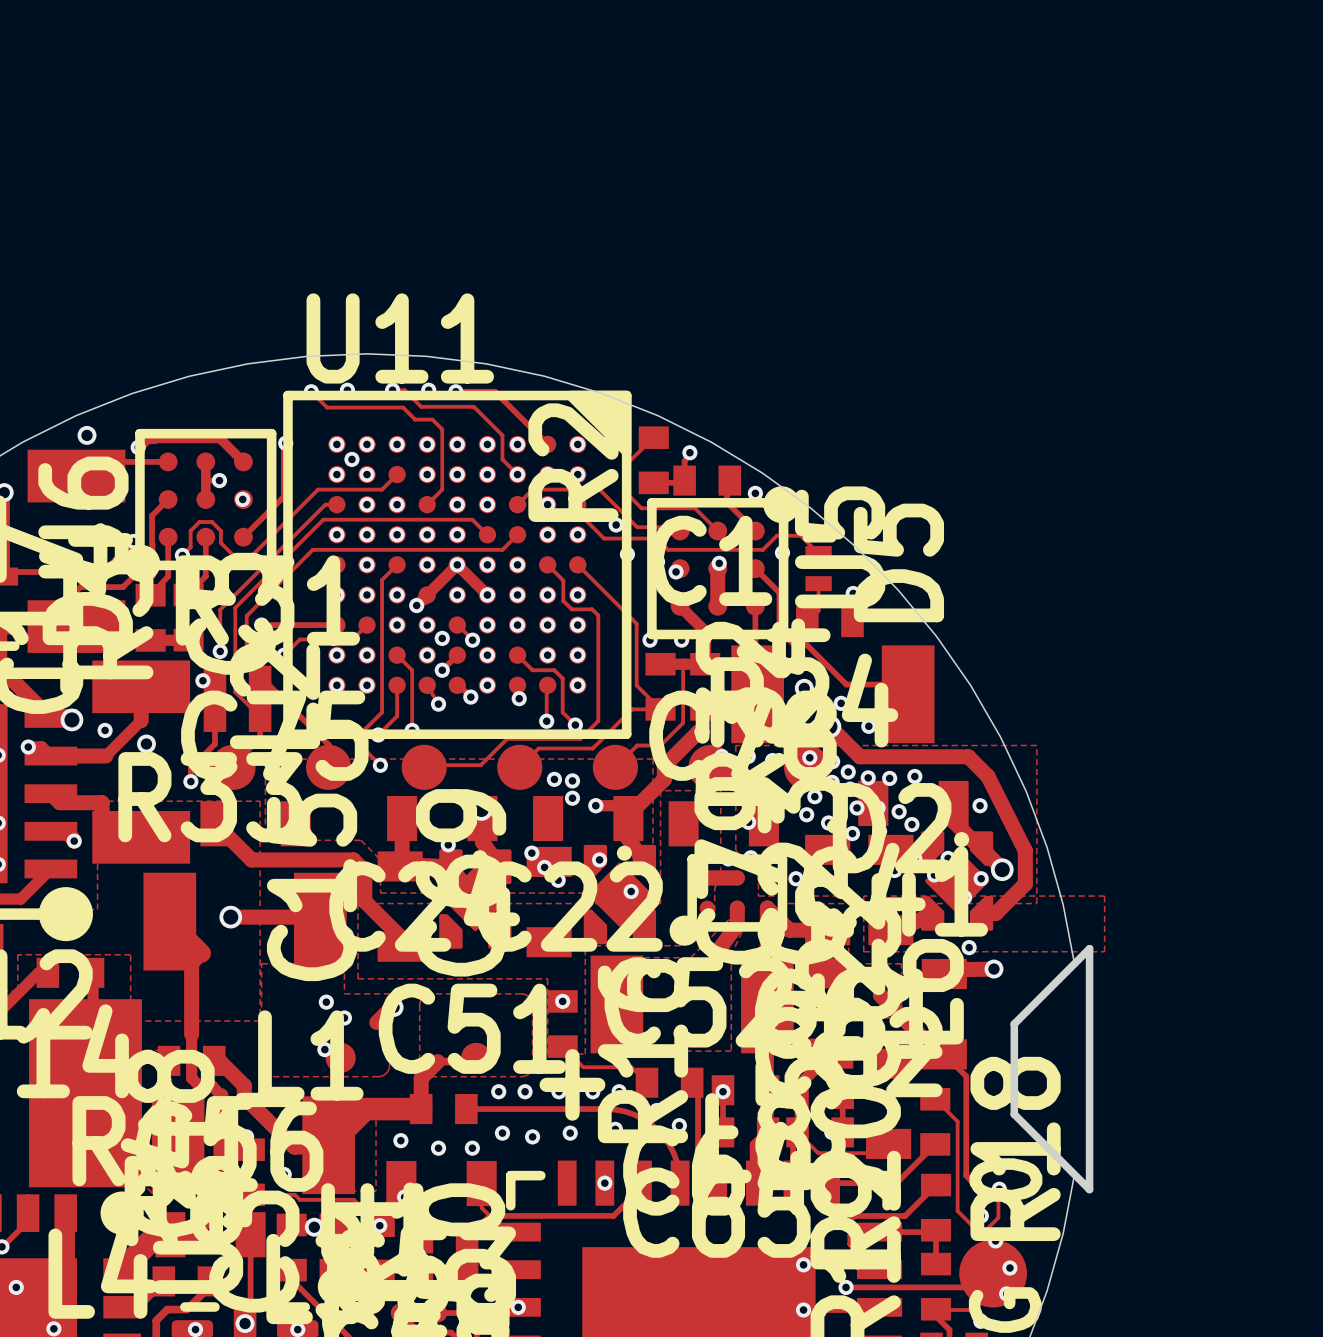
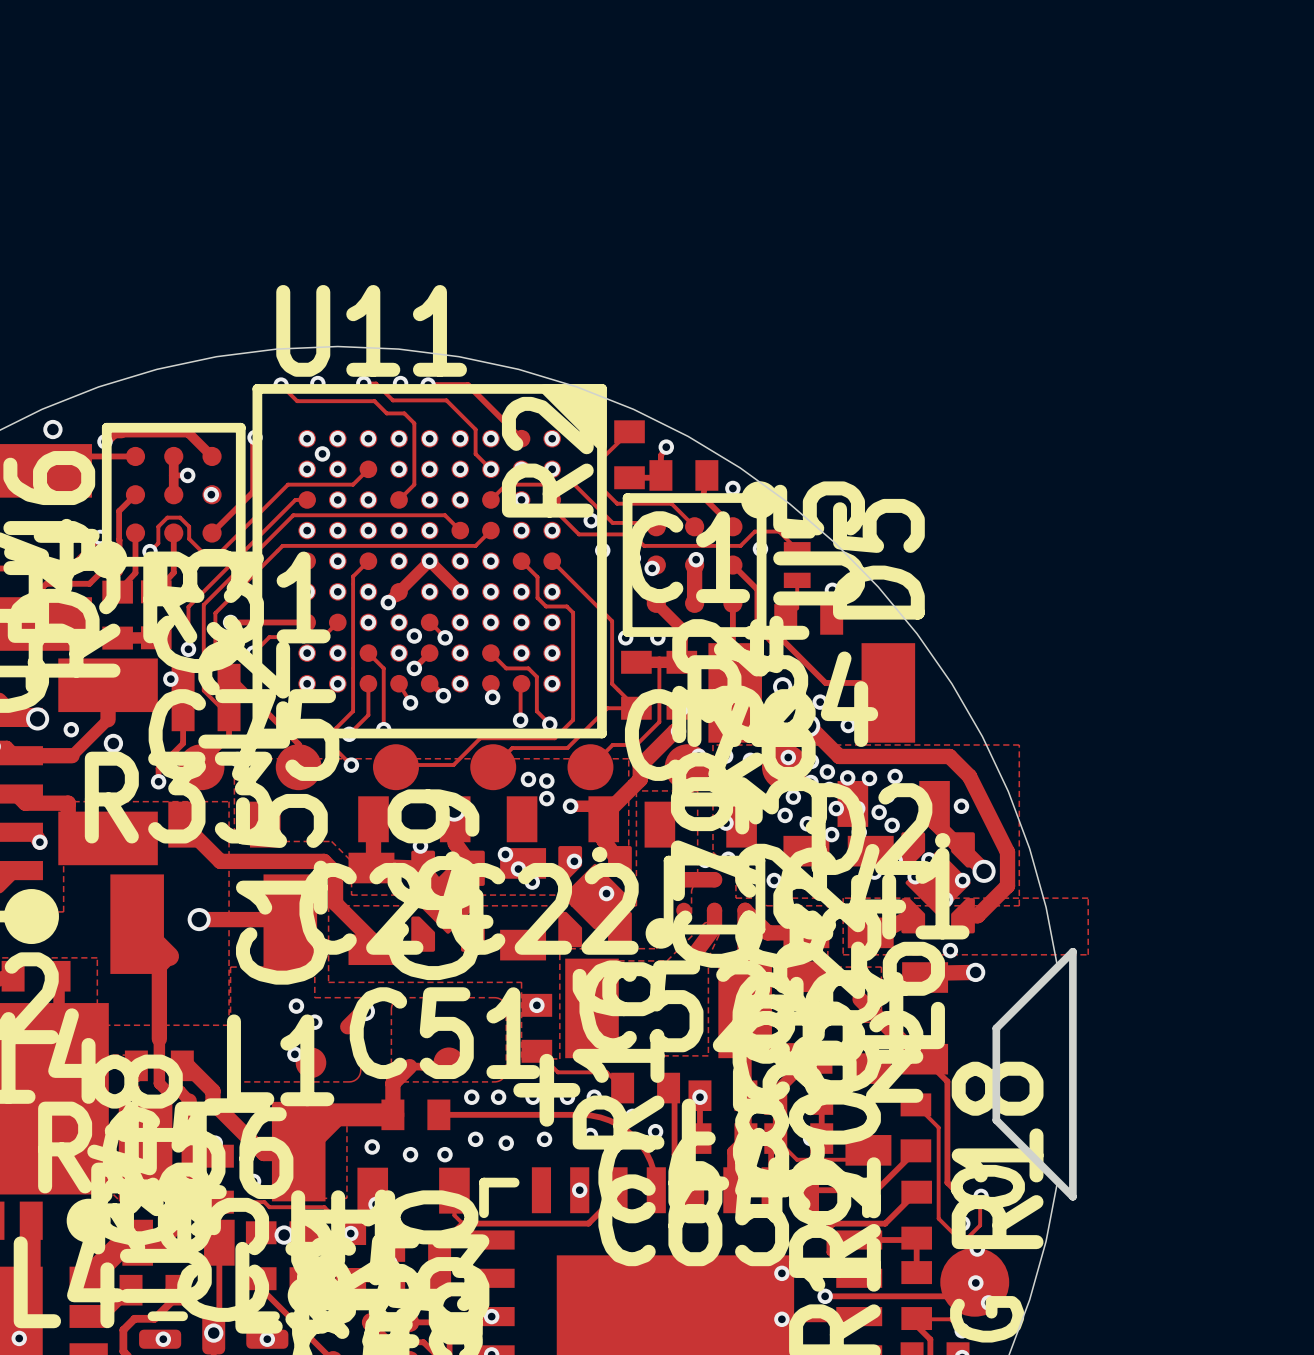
via position: (1009, 1268) -> (975, 1282)

